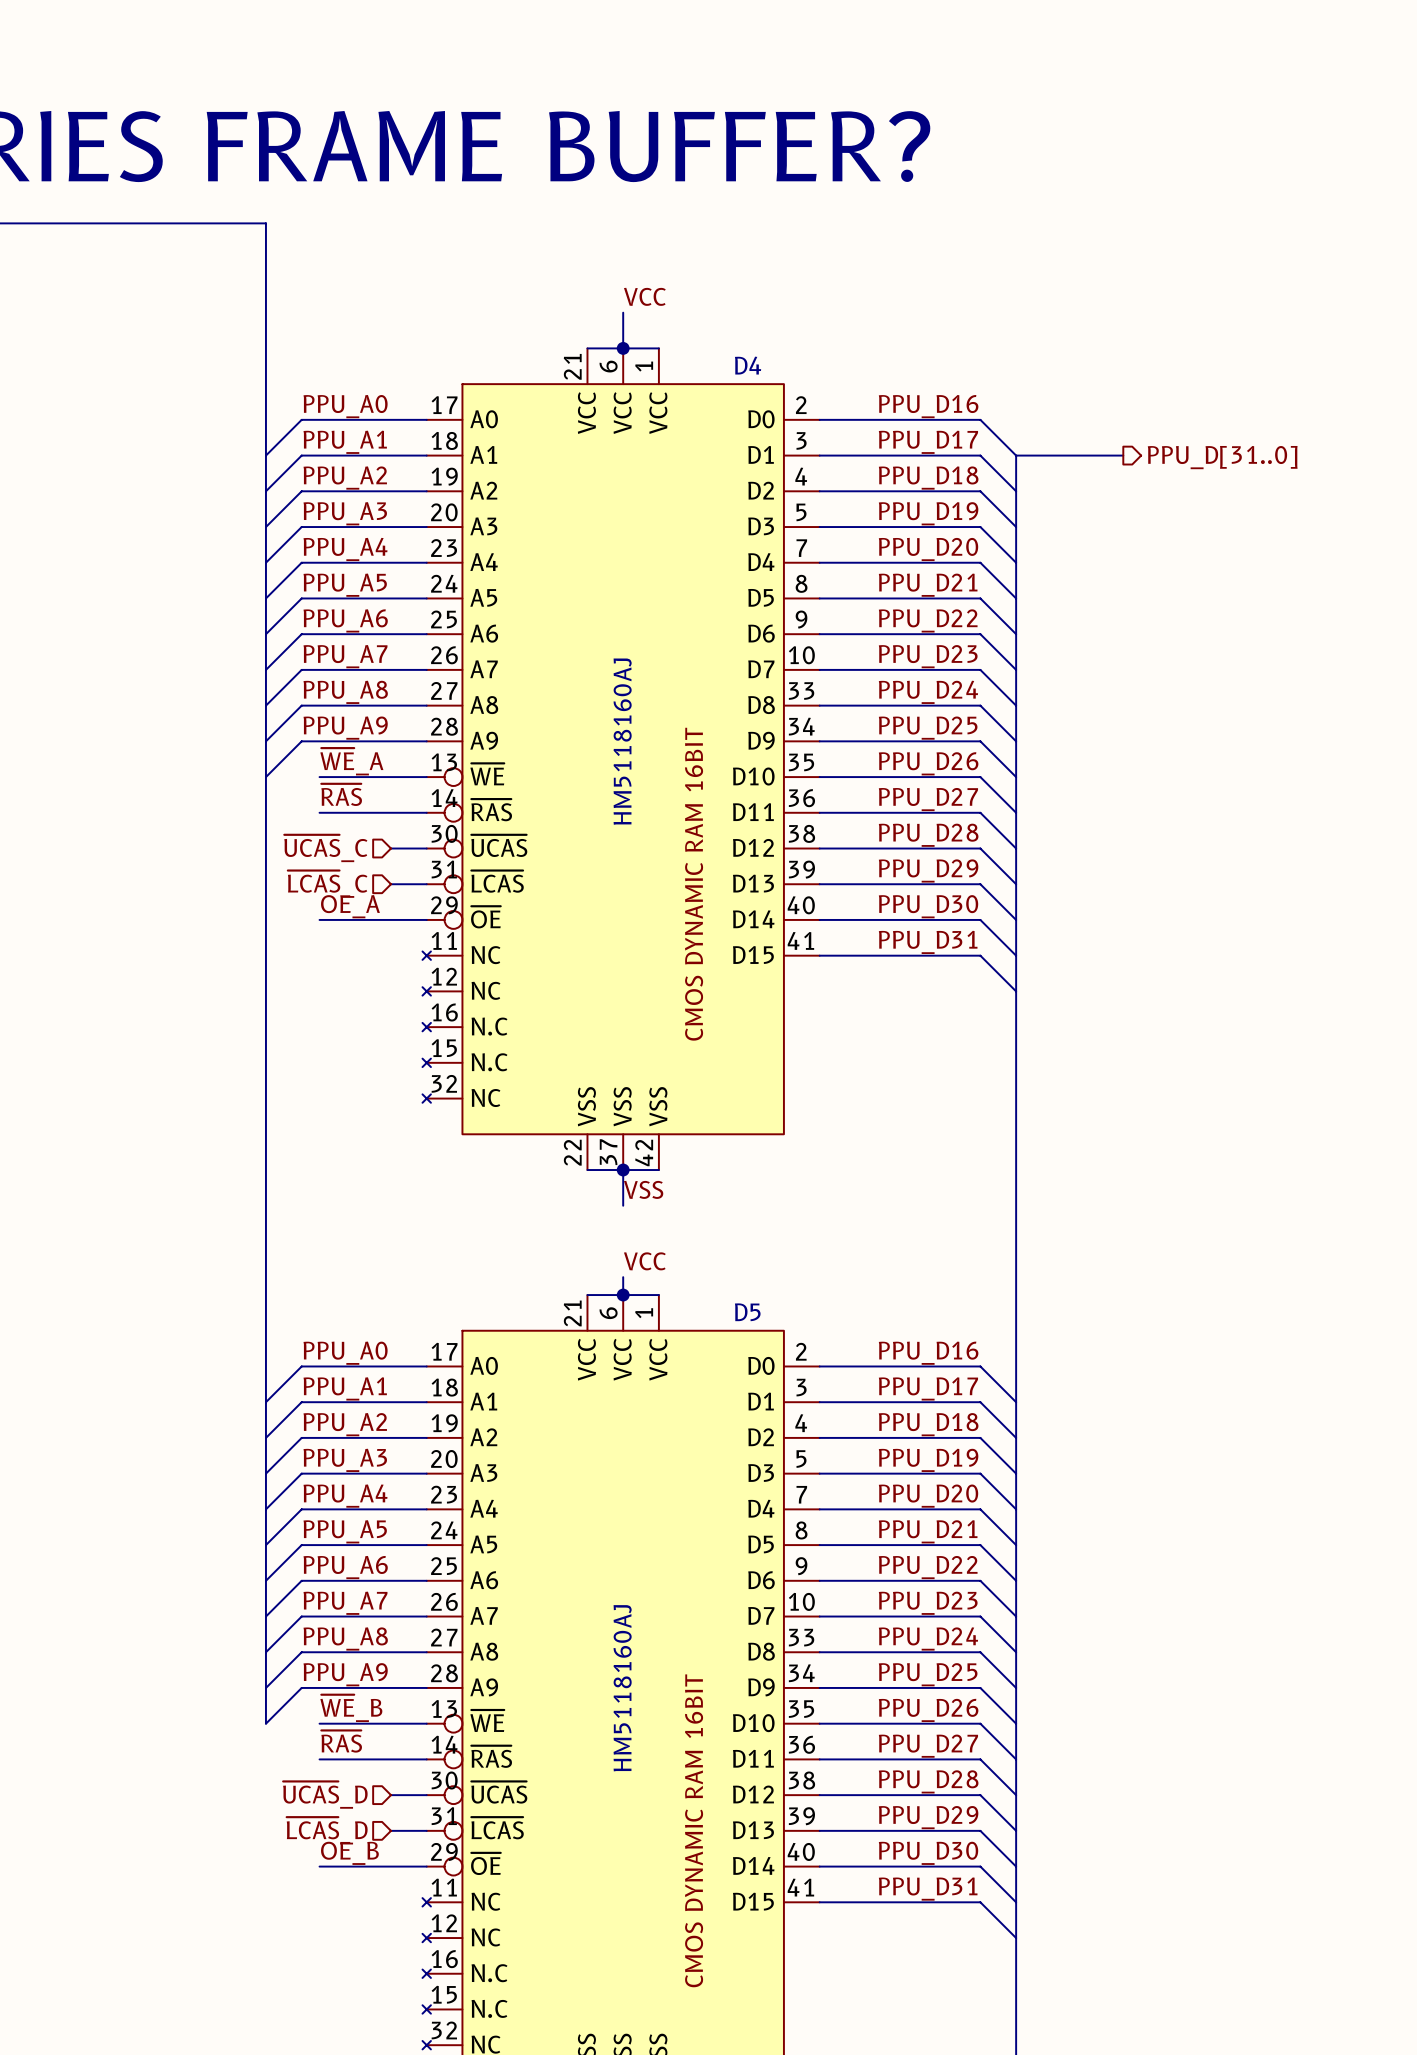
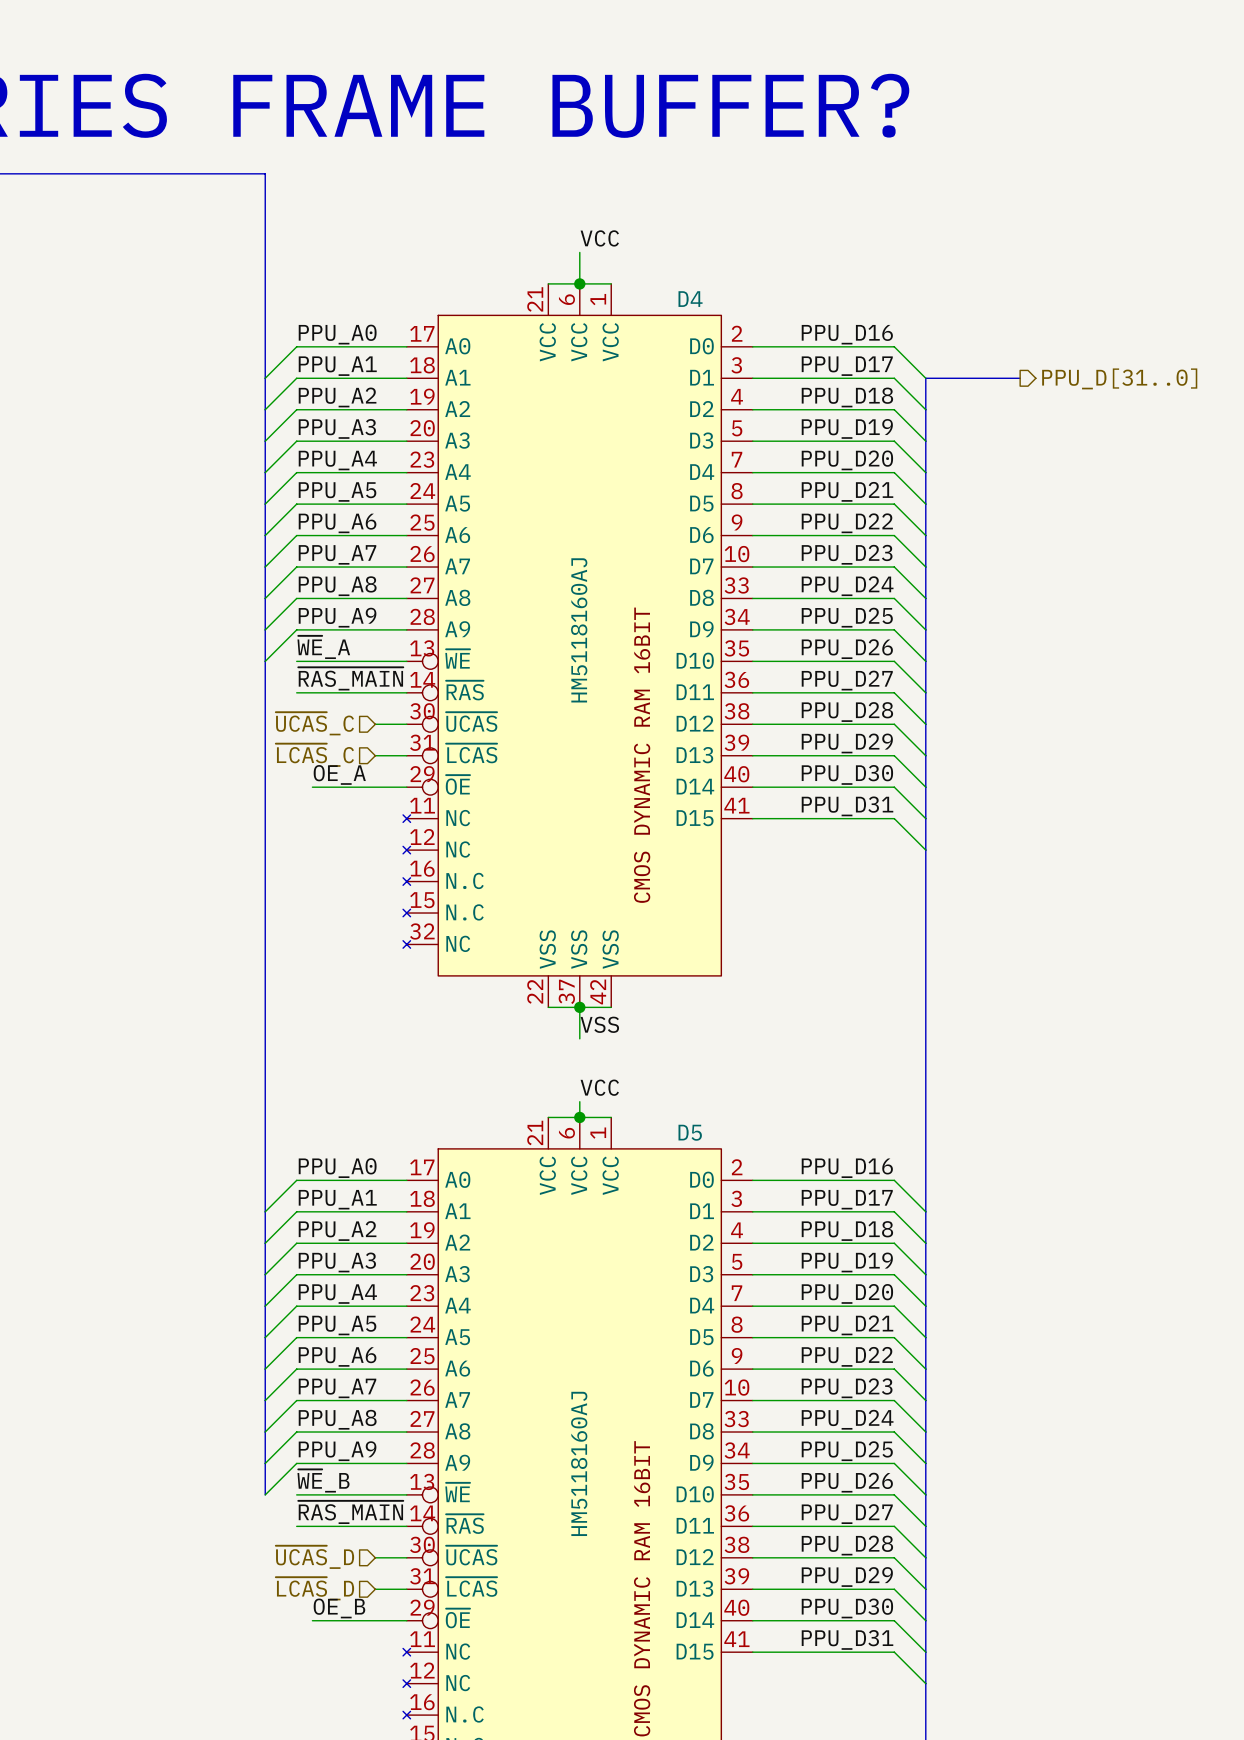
label position: ~{WE}_A (351, 761) -> ~{WE}_A (323, 647)
wire: none -> (296, 661) (312, 661)
label: ~{RAS} (341, 794) -> ~{RAS_MAIN} (350, 678)
wire: none -> (296, 692) (312, 692)
label position: ~{WE}_B (351, 1708) -> ~{WE}_B (323, 1480)
wire: none -> (296, 1494) (312, 1494)
label: ~{RAS} (341, 1741) -> ~{RAS_MAIN} (350, 1512)
wire: none -> (296, 1526) (312, 1526)

